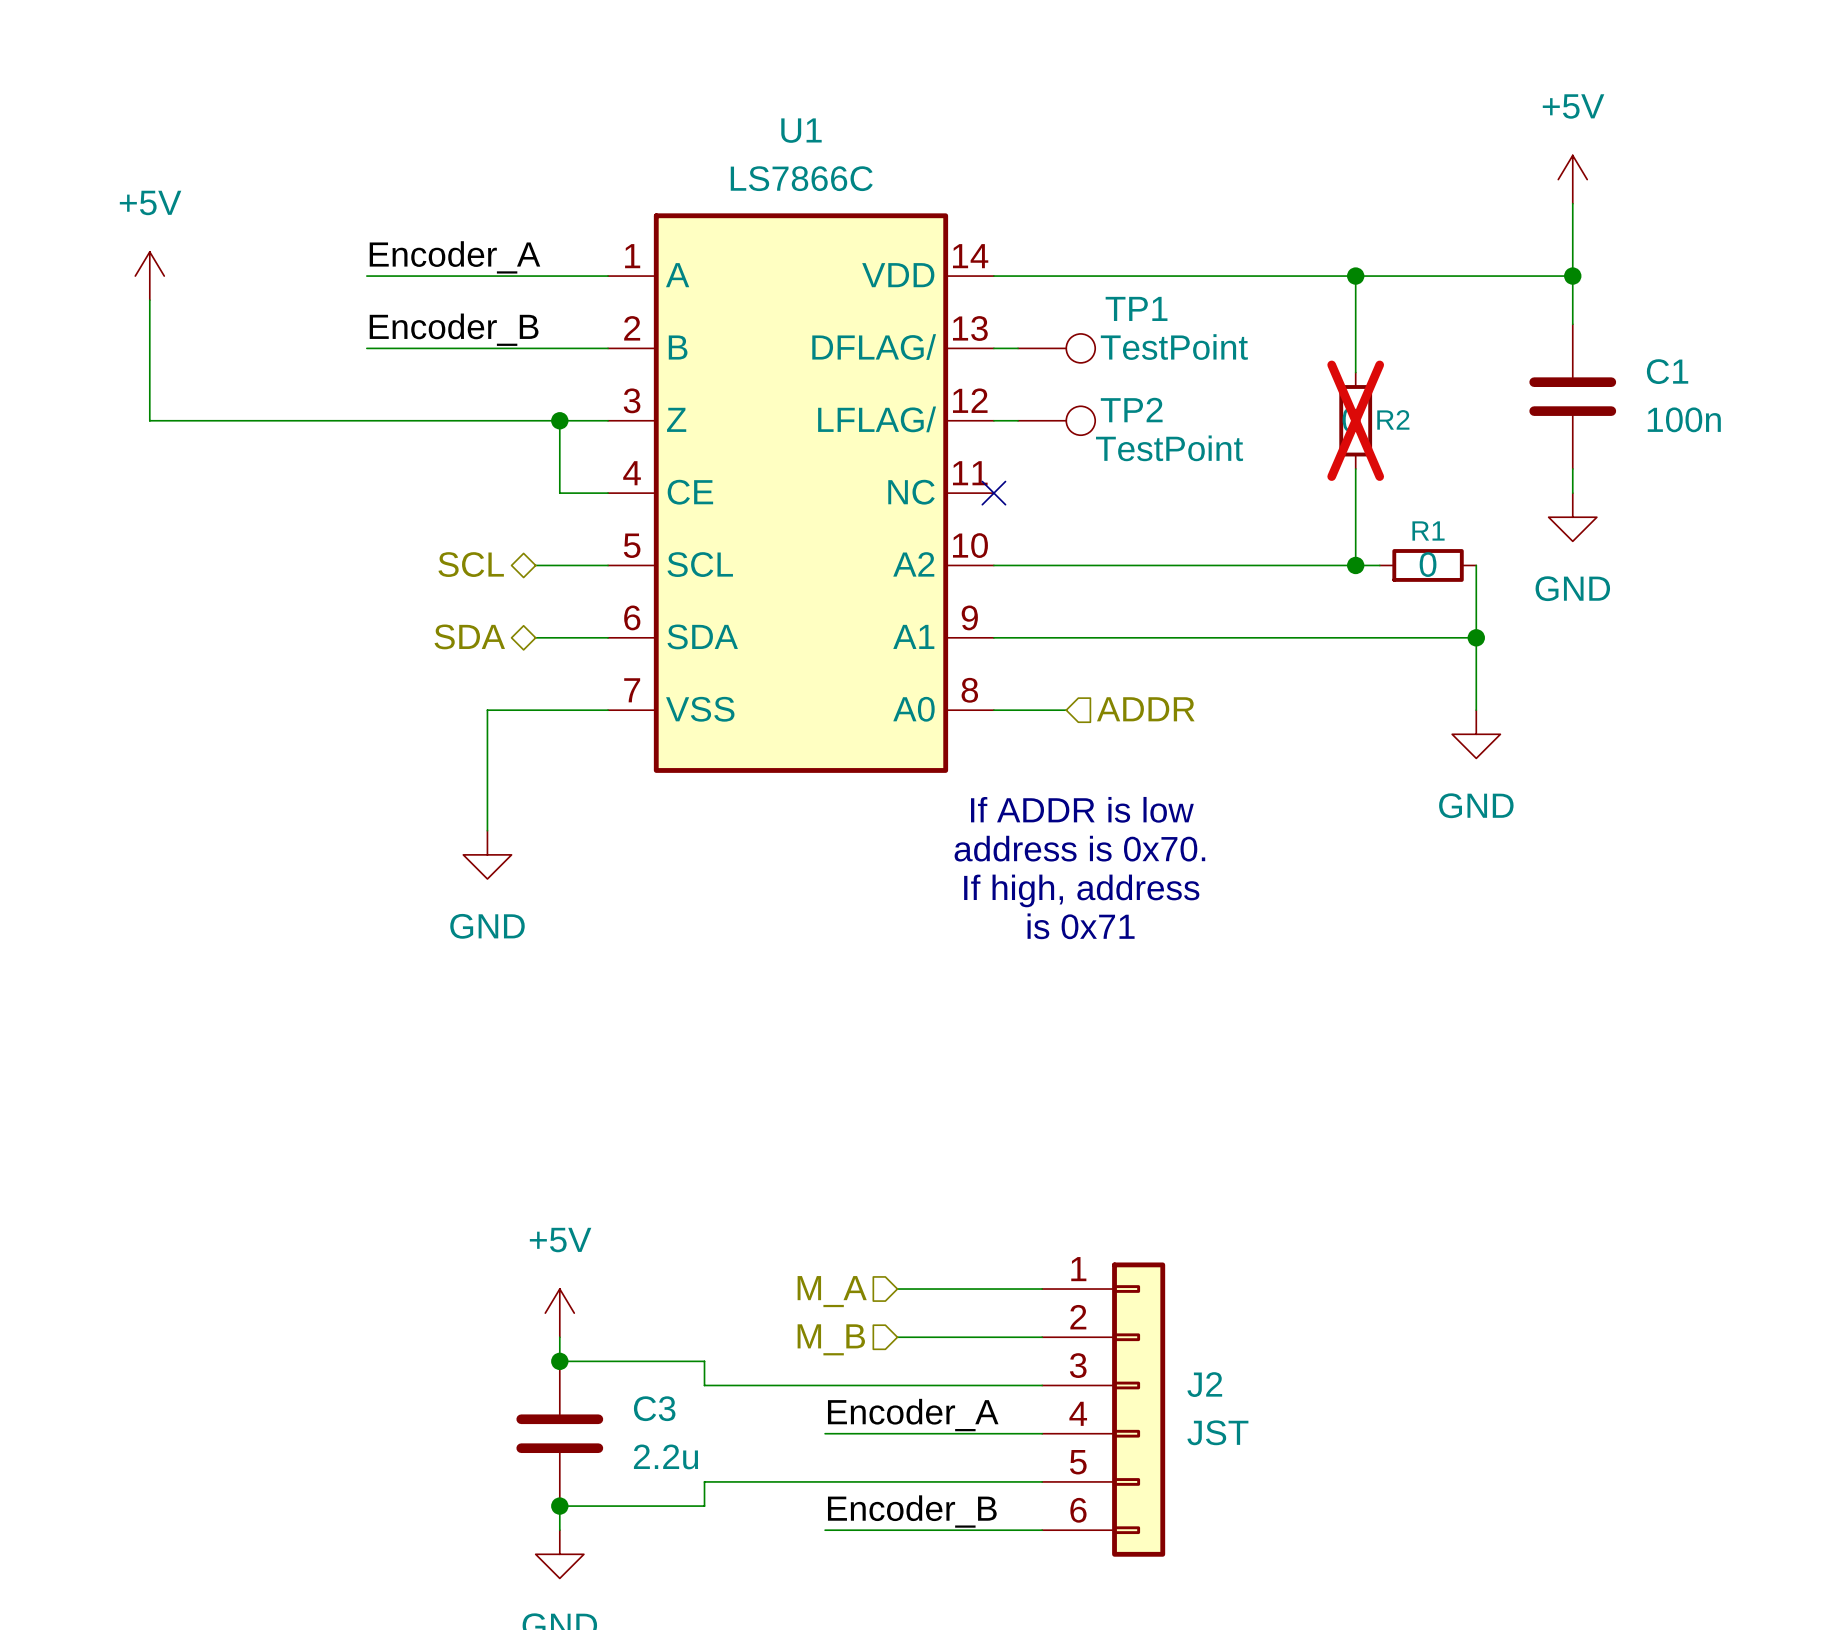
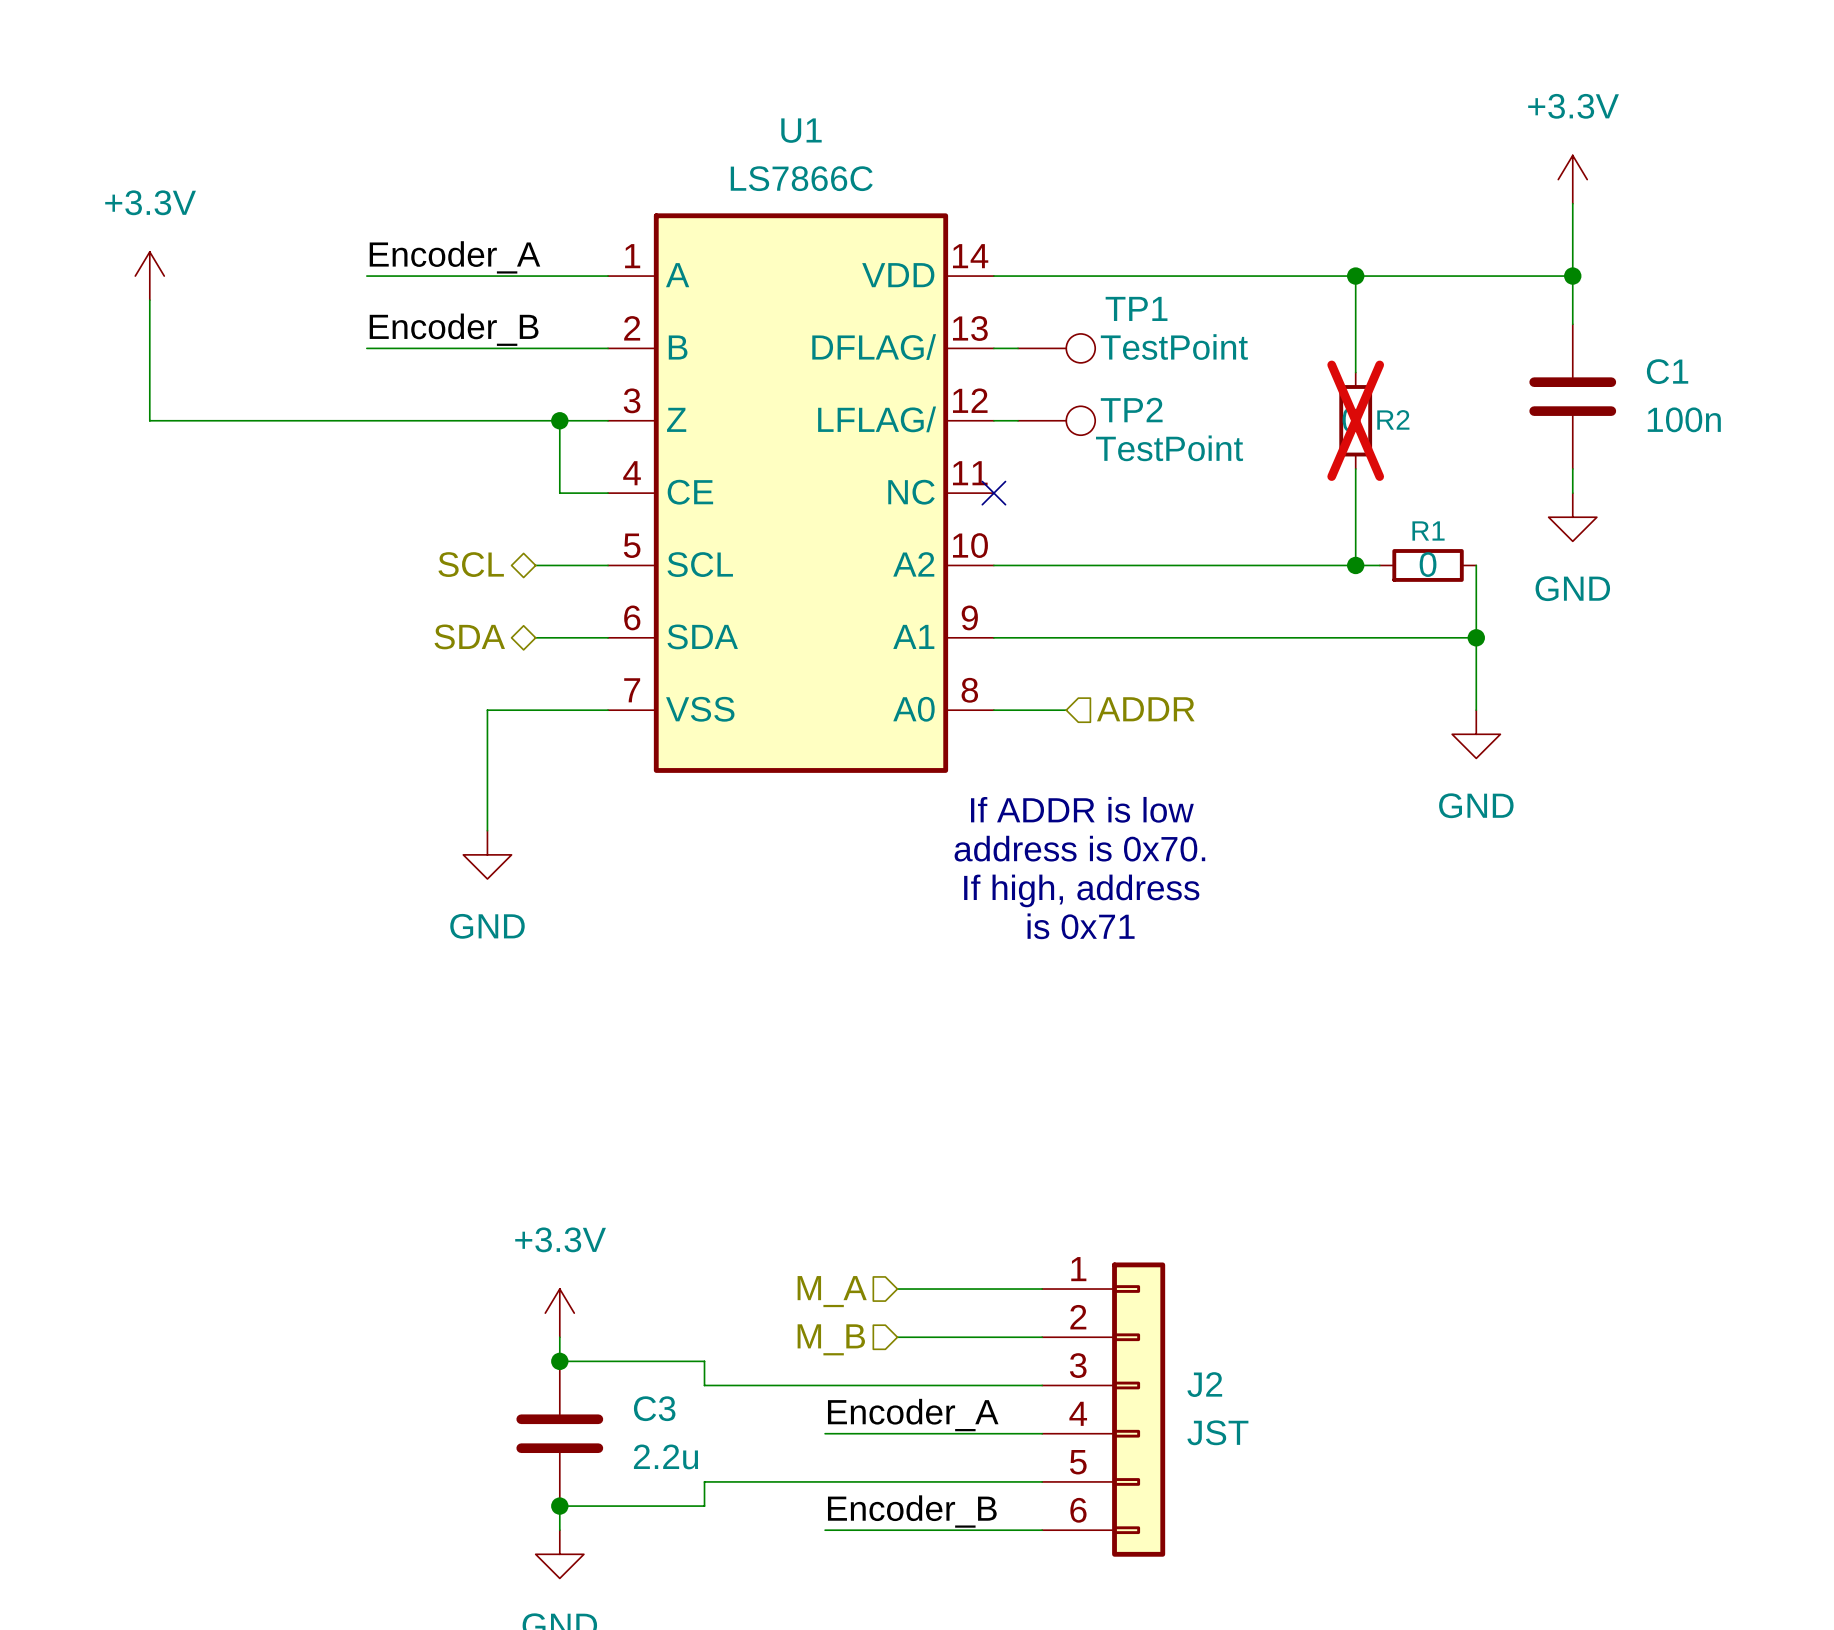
power symbol: +5V (1572, 179) -> +3.3V (1572, 179)
power symbol: +5V (149, 276) -> +3.3V (149, 276)
power symbol: +5V (559, 1313) -> +3.3V (559, 1313)

